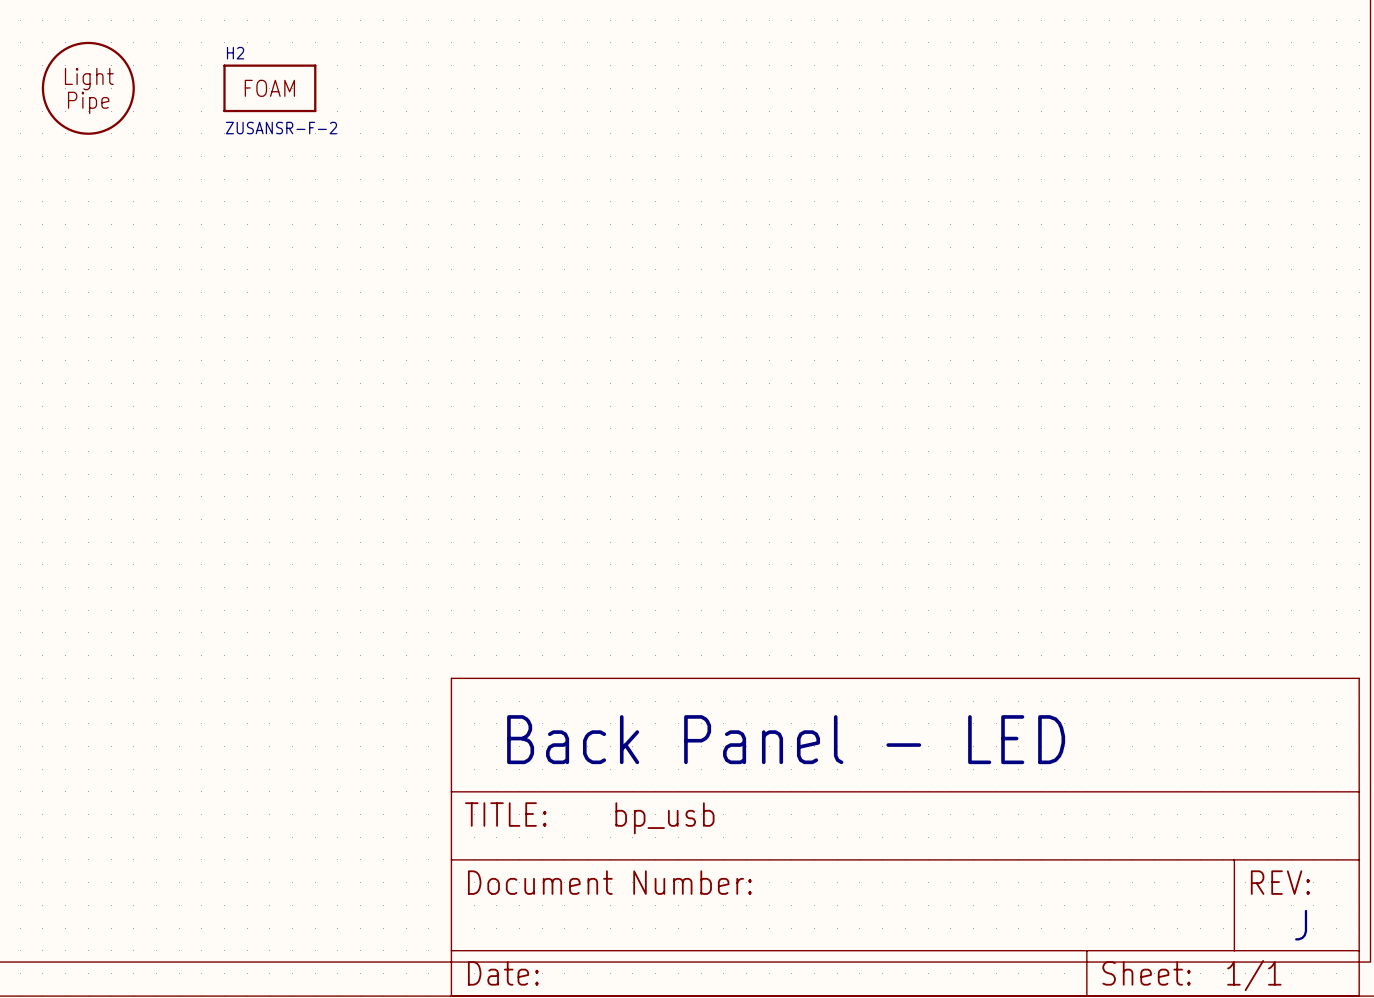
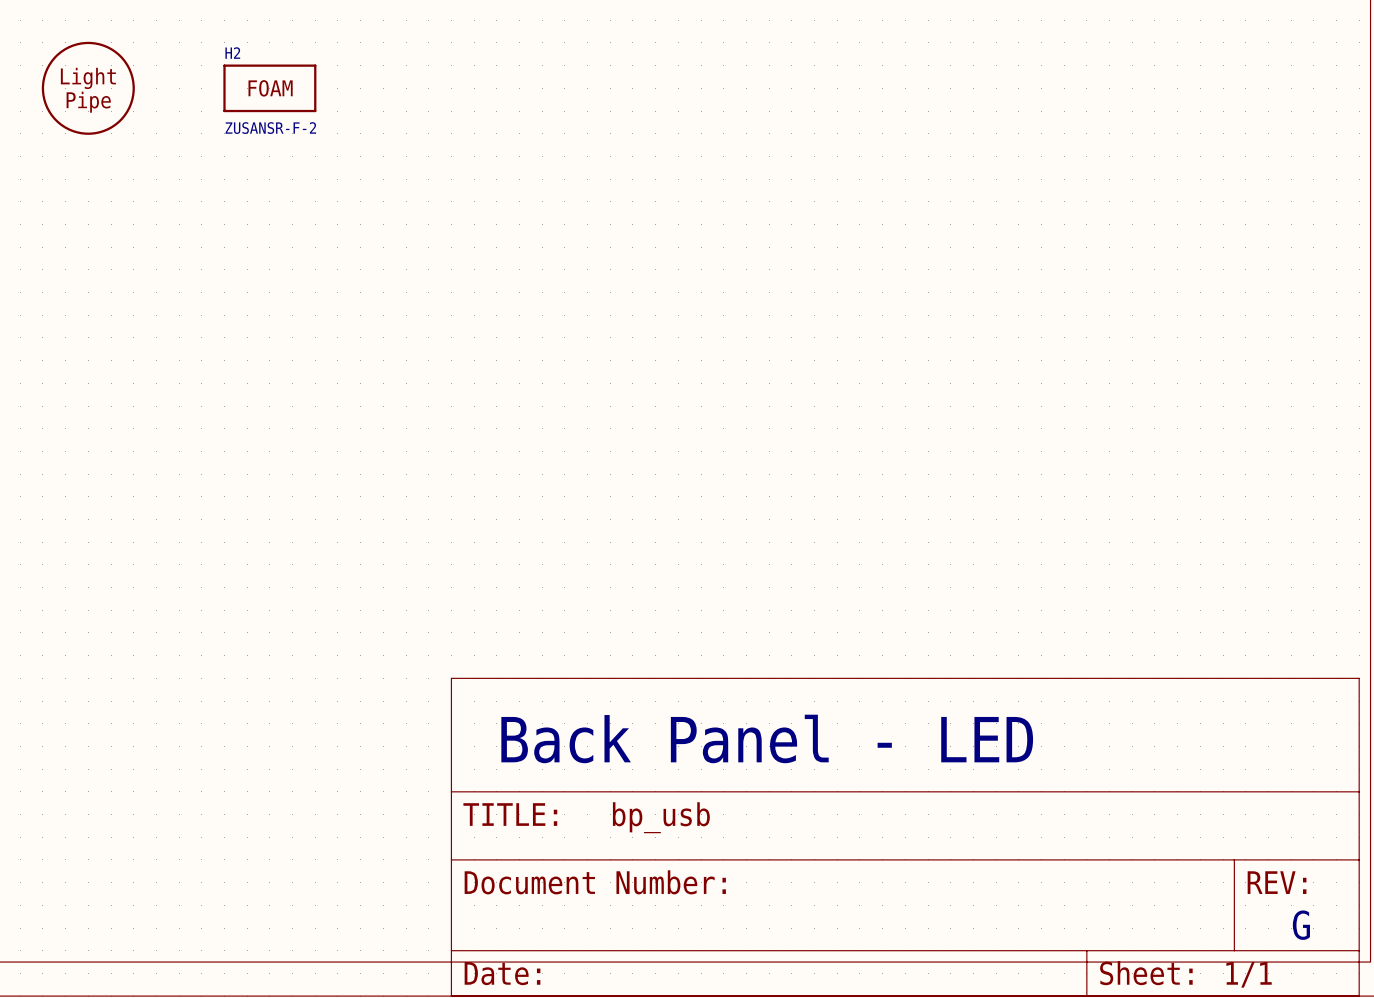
text: J (1301, 925) -> G (1301, 925)

